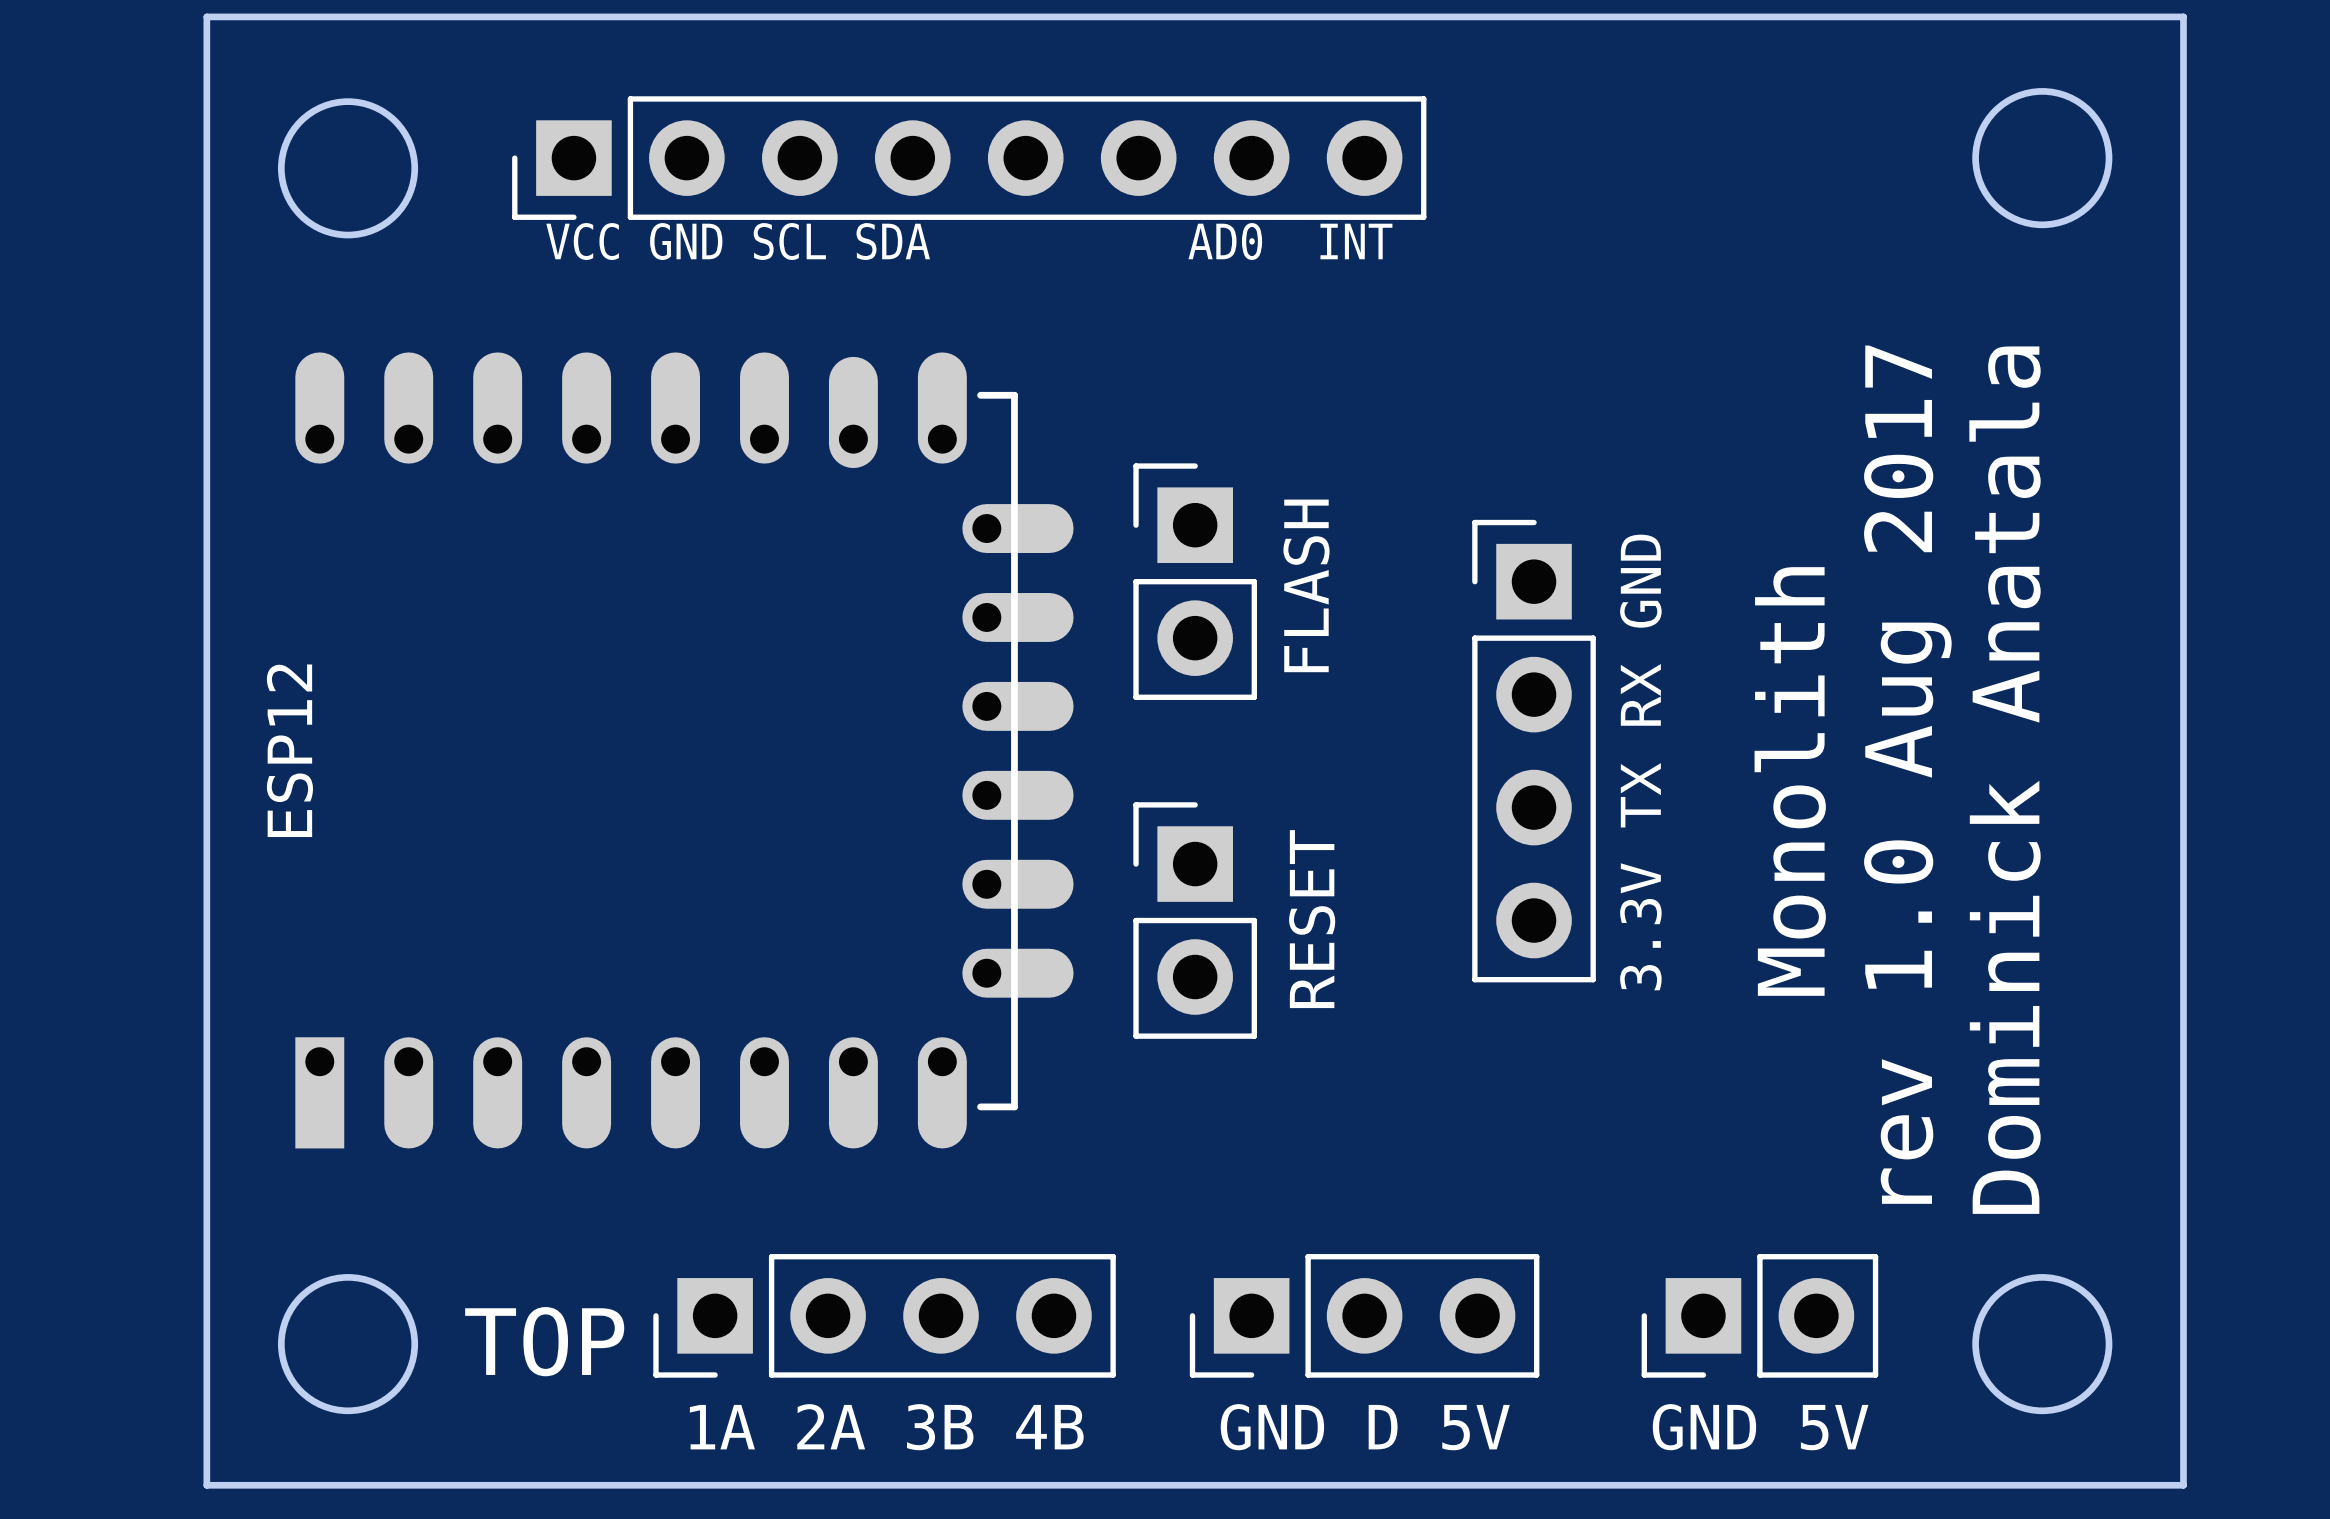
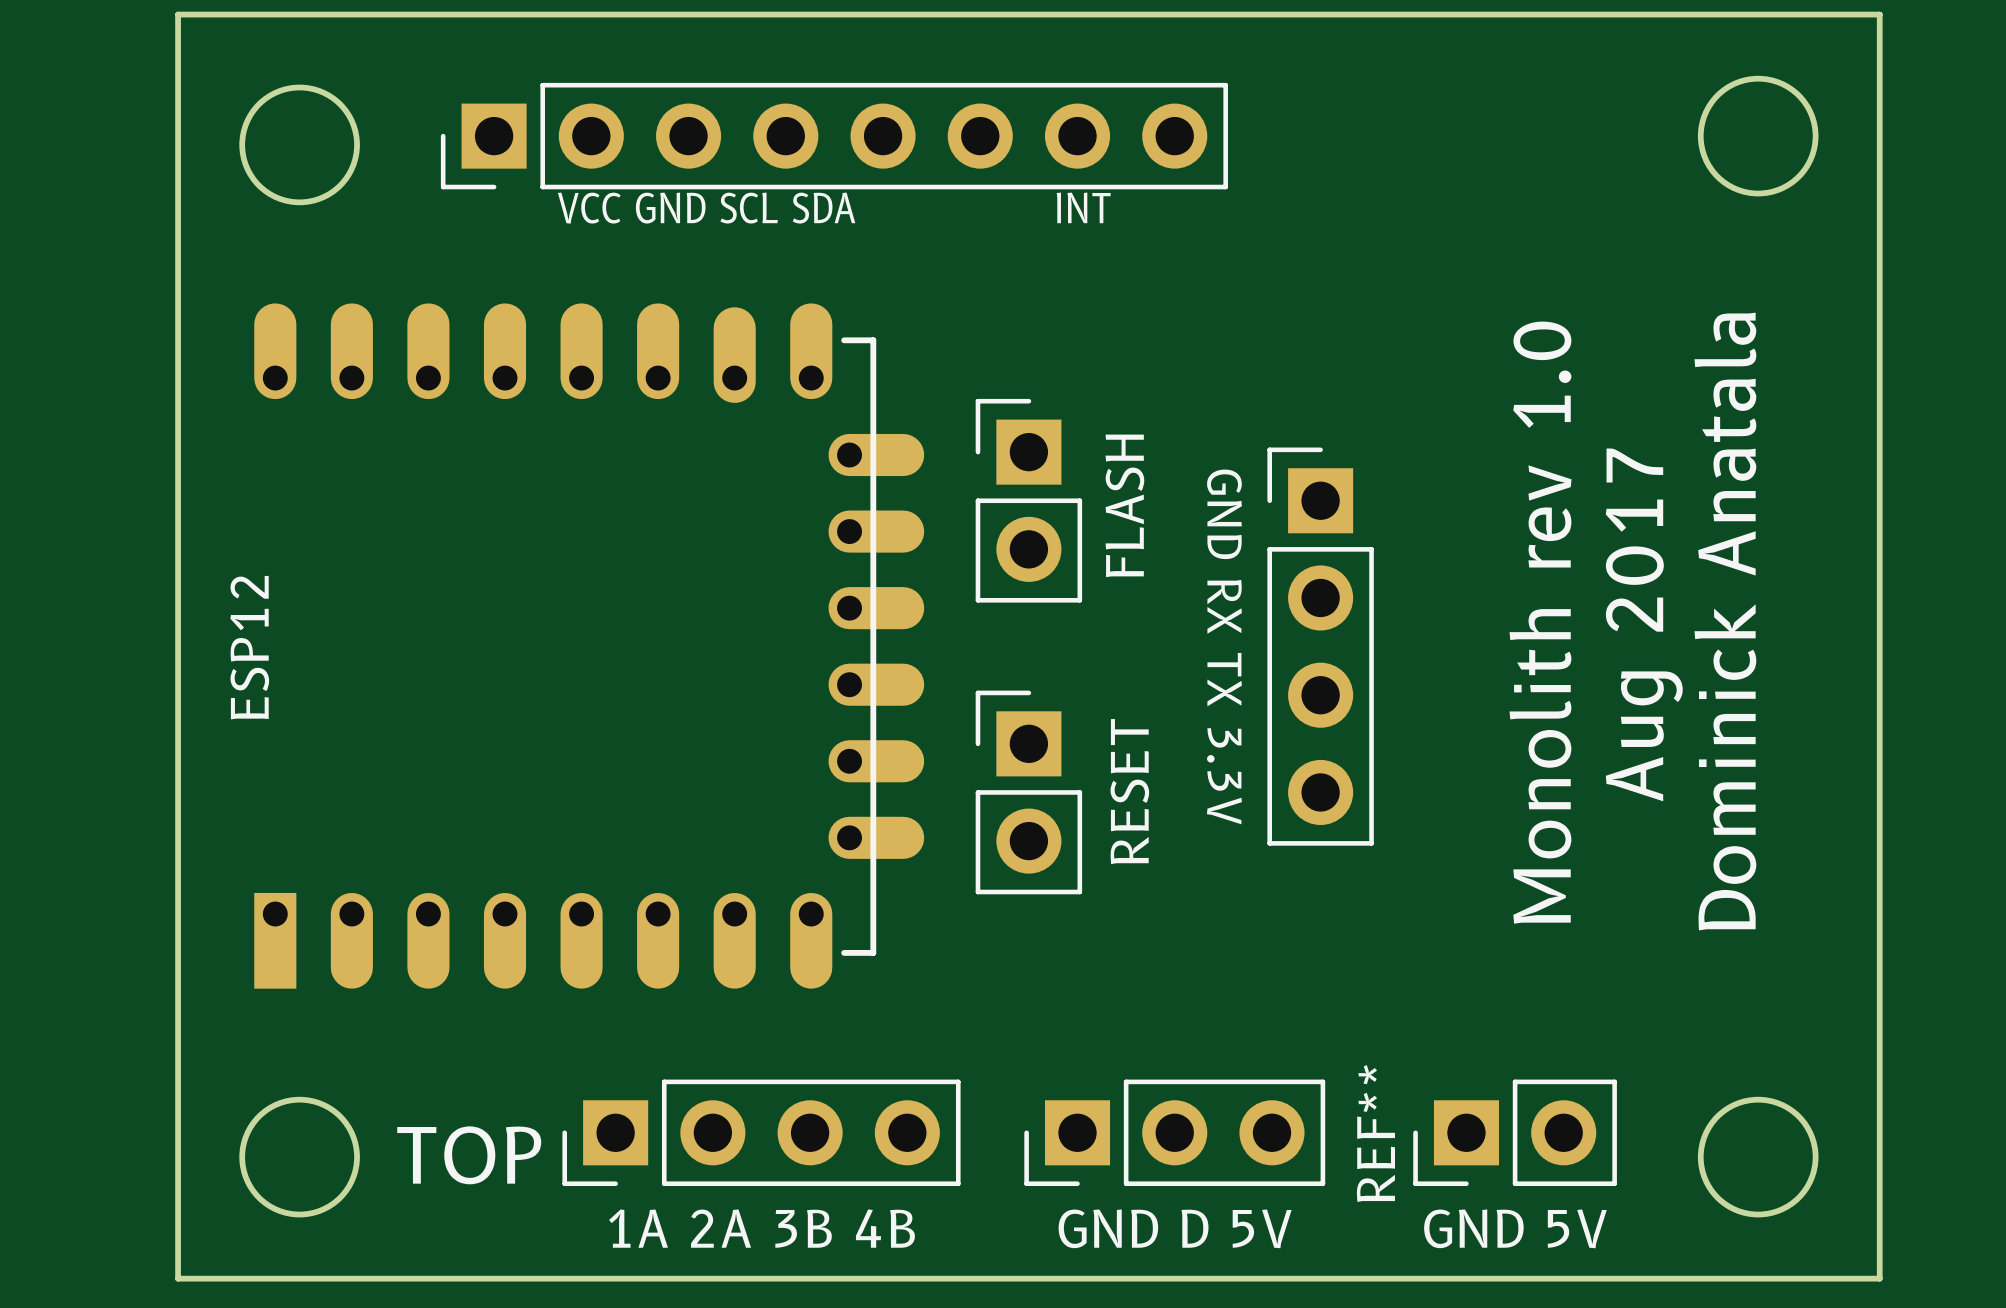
text: VCC GND SCL SDA AD0 INT (969, 241) -> VCC GND SCL SDA INT (834, 208)
text: none -> GND RX TX 3.3V (1224, 646)
text: 3.3V TX RX GND (1640, 762) -> none
text: rev 1.0 Aug 2017 (1907, 774) -> Aug 2017 (1644, 624)
text position: Dominick Anatala (2005, 780) -> Dominick Anatala (1725, 621)
text: Monolith (1790, 781) -> Monolith rev 1.0 (1540, 622)
REF** name: none -> REF** (1375, 1133)

